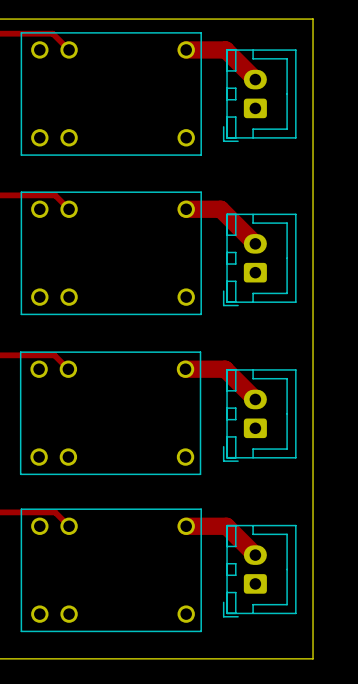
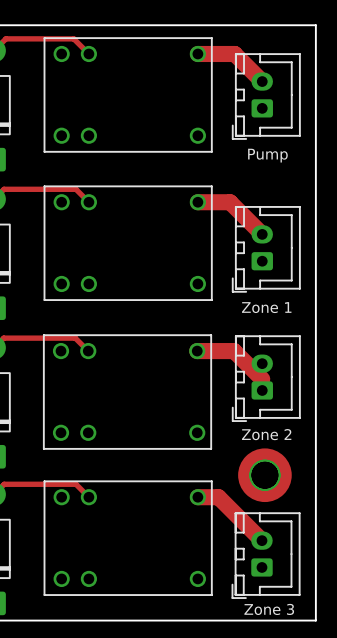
part value: none -> Pump (267, 155)
part value: none -> Zone 1 (266, 307)
part: none -> Zone 2 (266, 378)
part: (259, 415) -> none
part: none -> (264, 475)
part: none -> (264, 475)
track: (208, 526) (226, 526) (255, 555) -> (218, 497) (261, 540)
part: (259, 571) -> none
part: none -> Zone 3 (266, 555)

